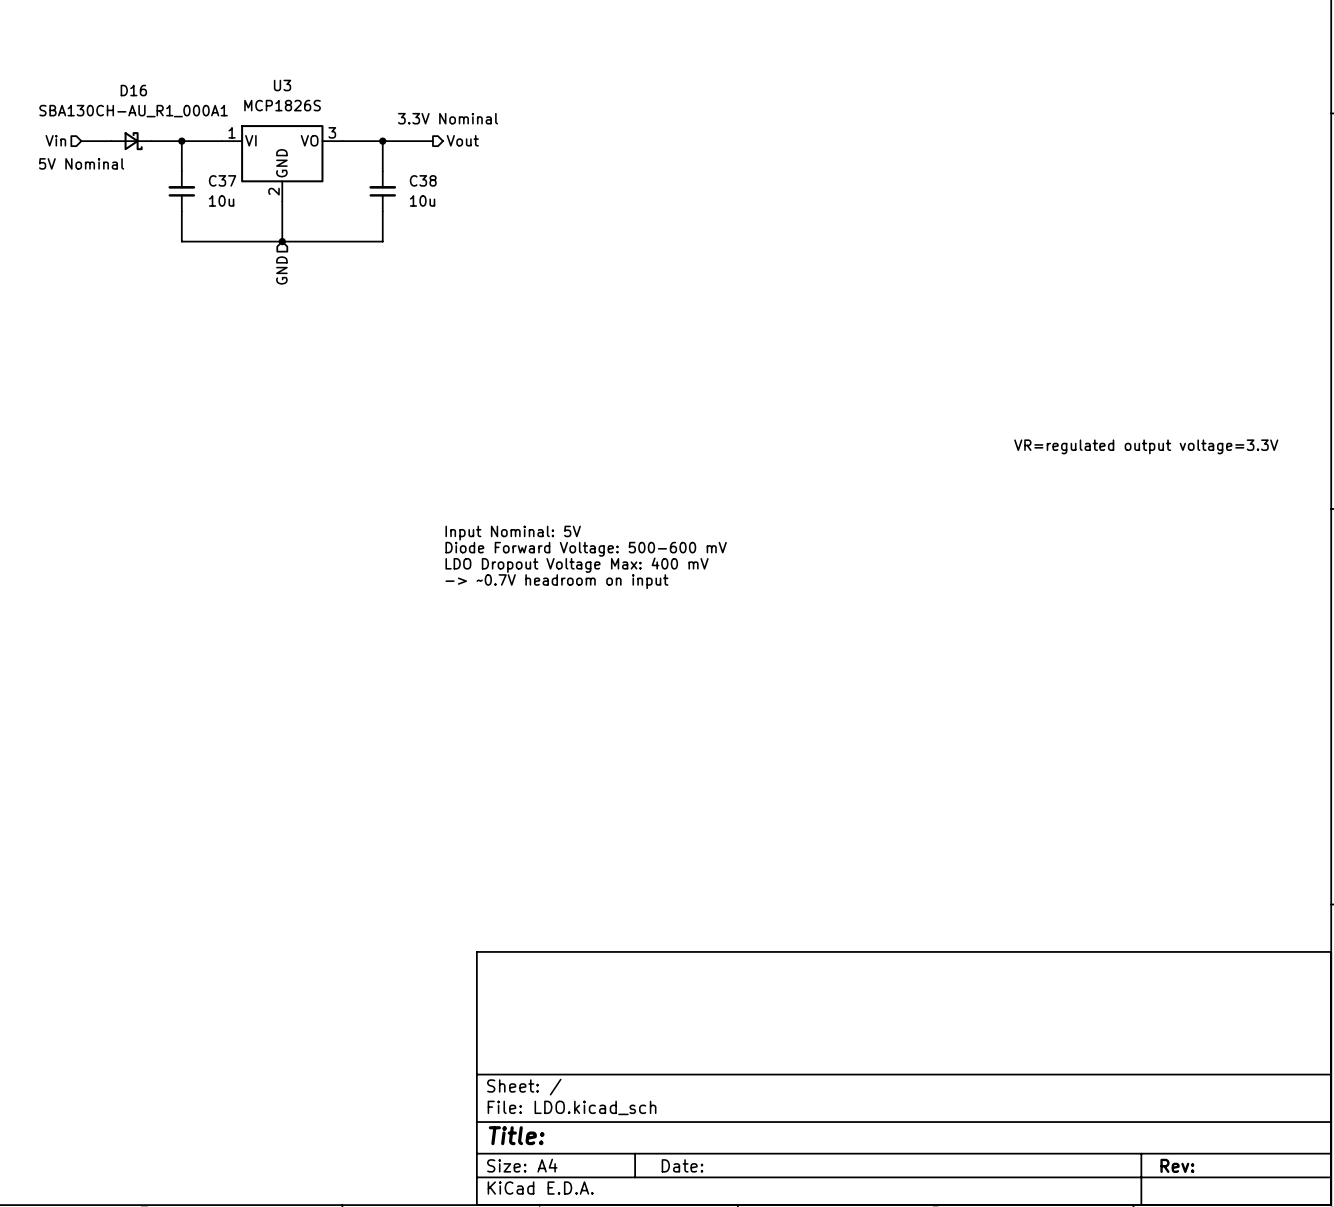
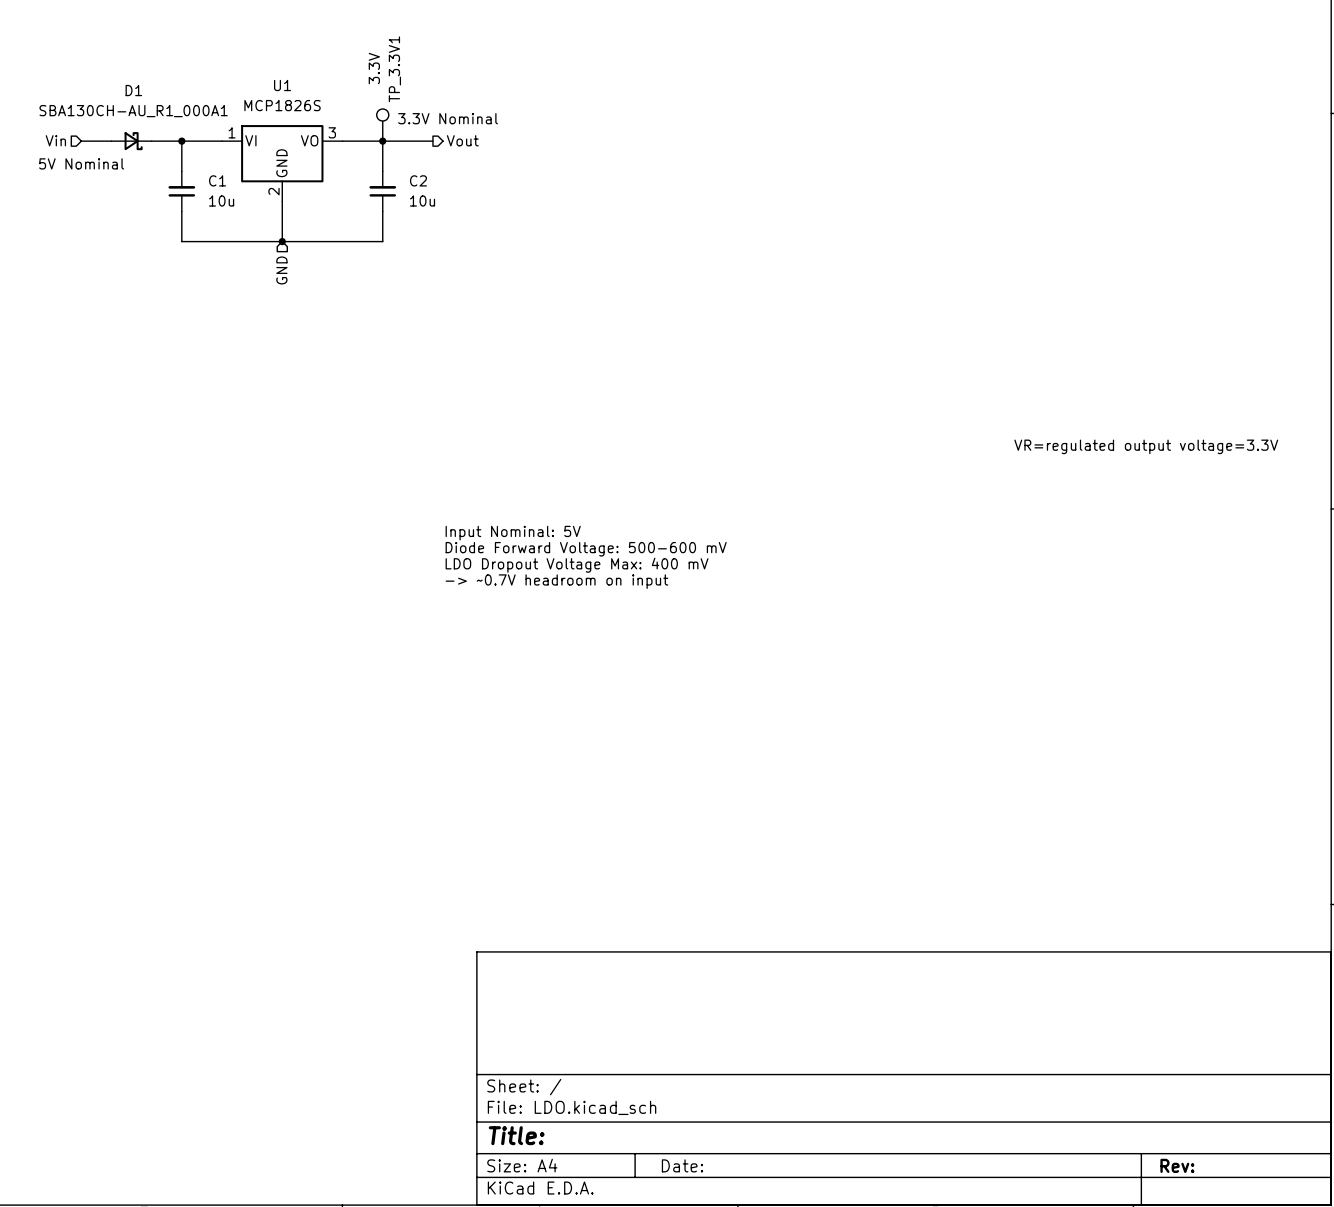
U3 name: U3 (282, 85) -> U1 (282, 85)
D16 name: D16 (133, 90) -> D1 (133, 90)
TP_3.3V1: none -> 3.3V (382, 125)
C37 name: C37 (222, 180) -> C1 (217, 180)
C38 name: C38 (423, 180) -> C2 (418, 180)

